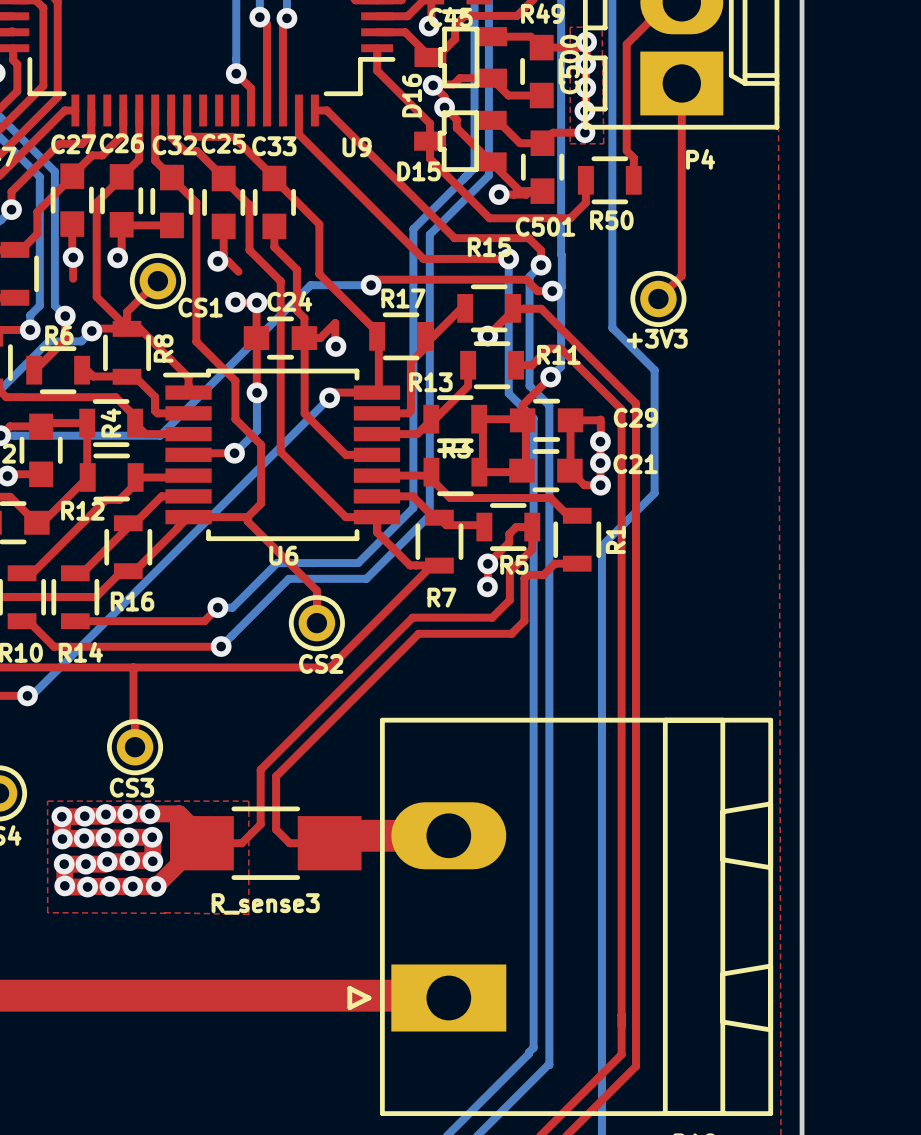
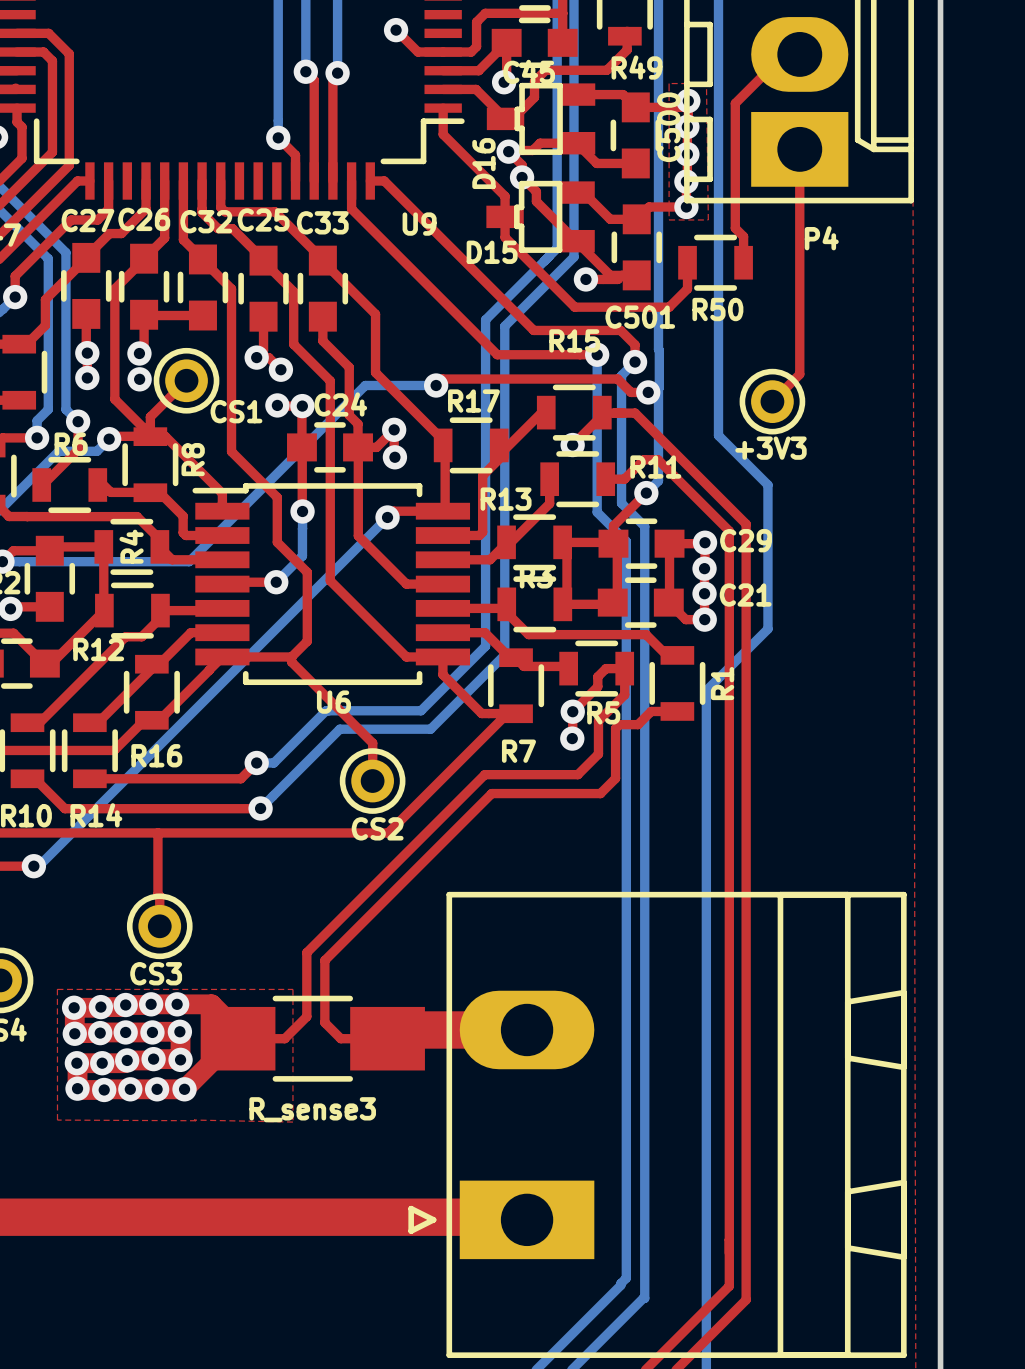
via: none -> (280, 369)
via: none -> (87, 378)
via: none -> (139, 379)
via: none -> (394, 429)
via: none -> (705, 542)

